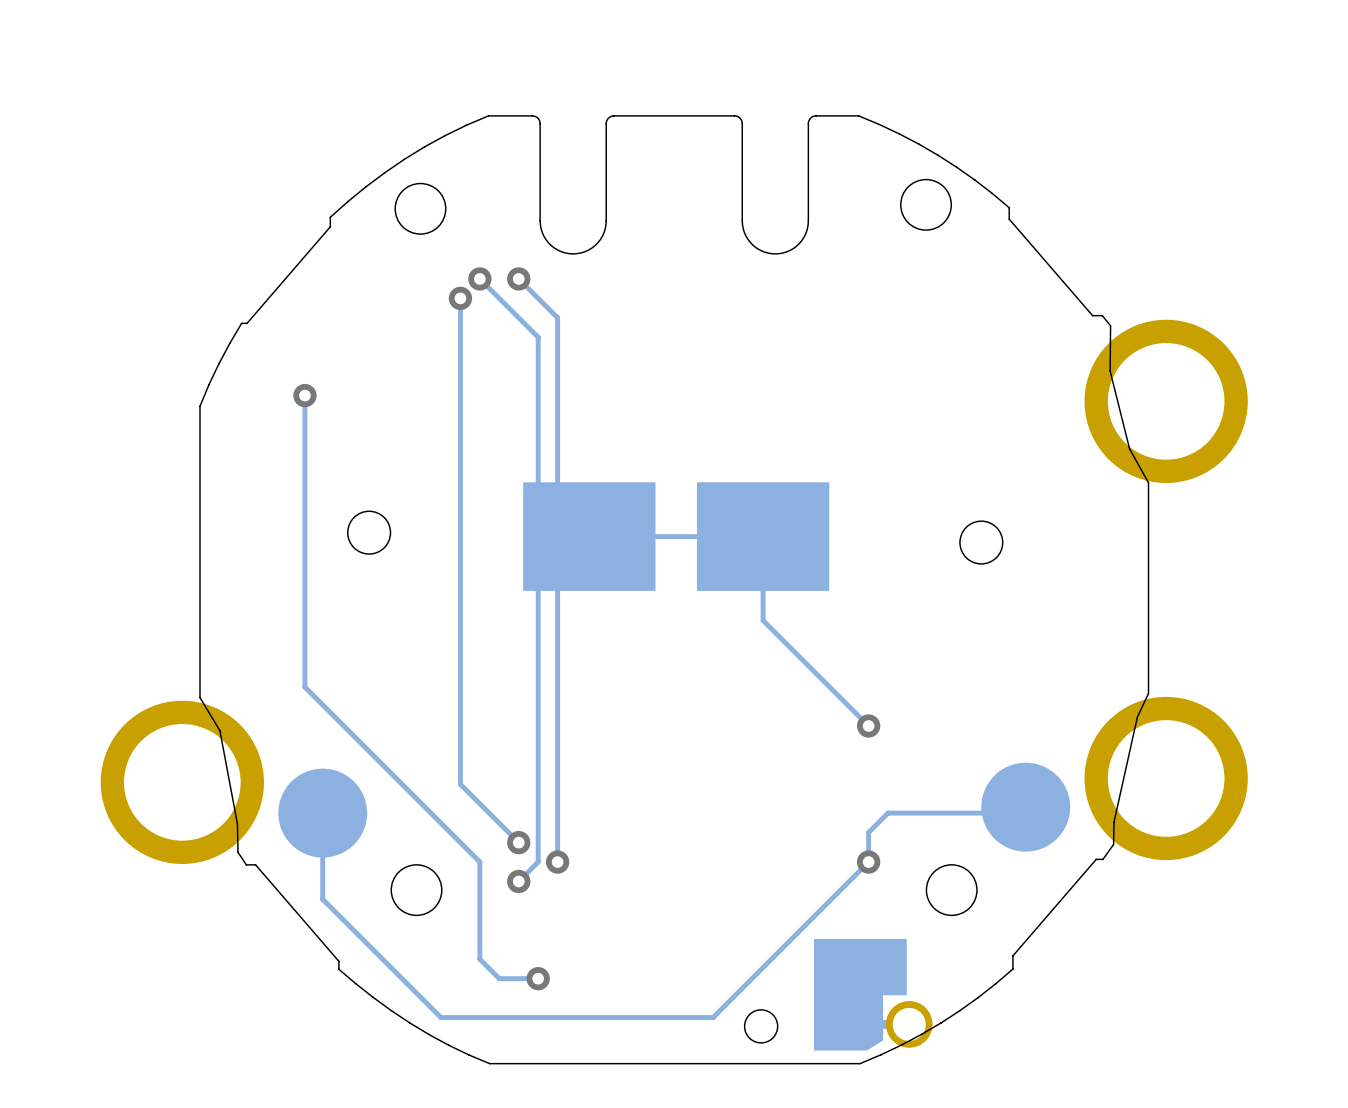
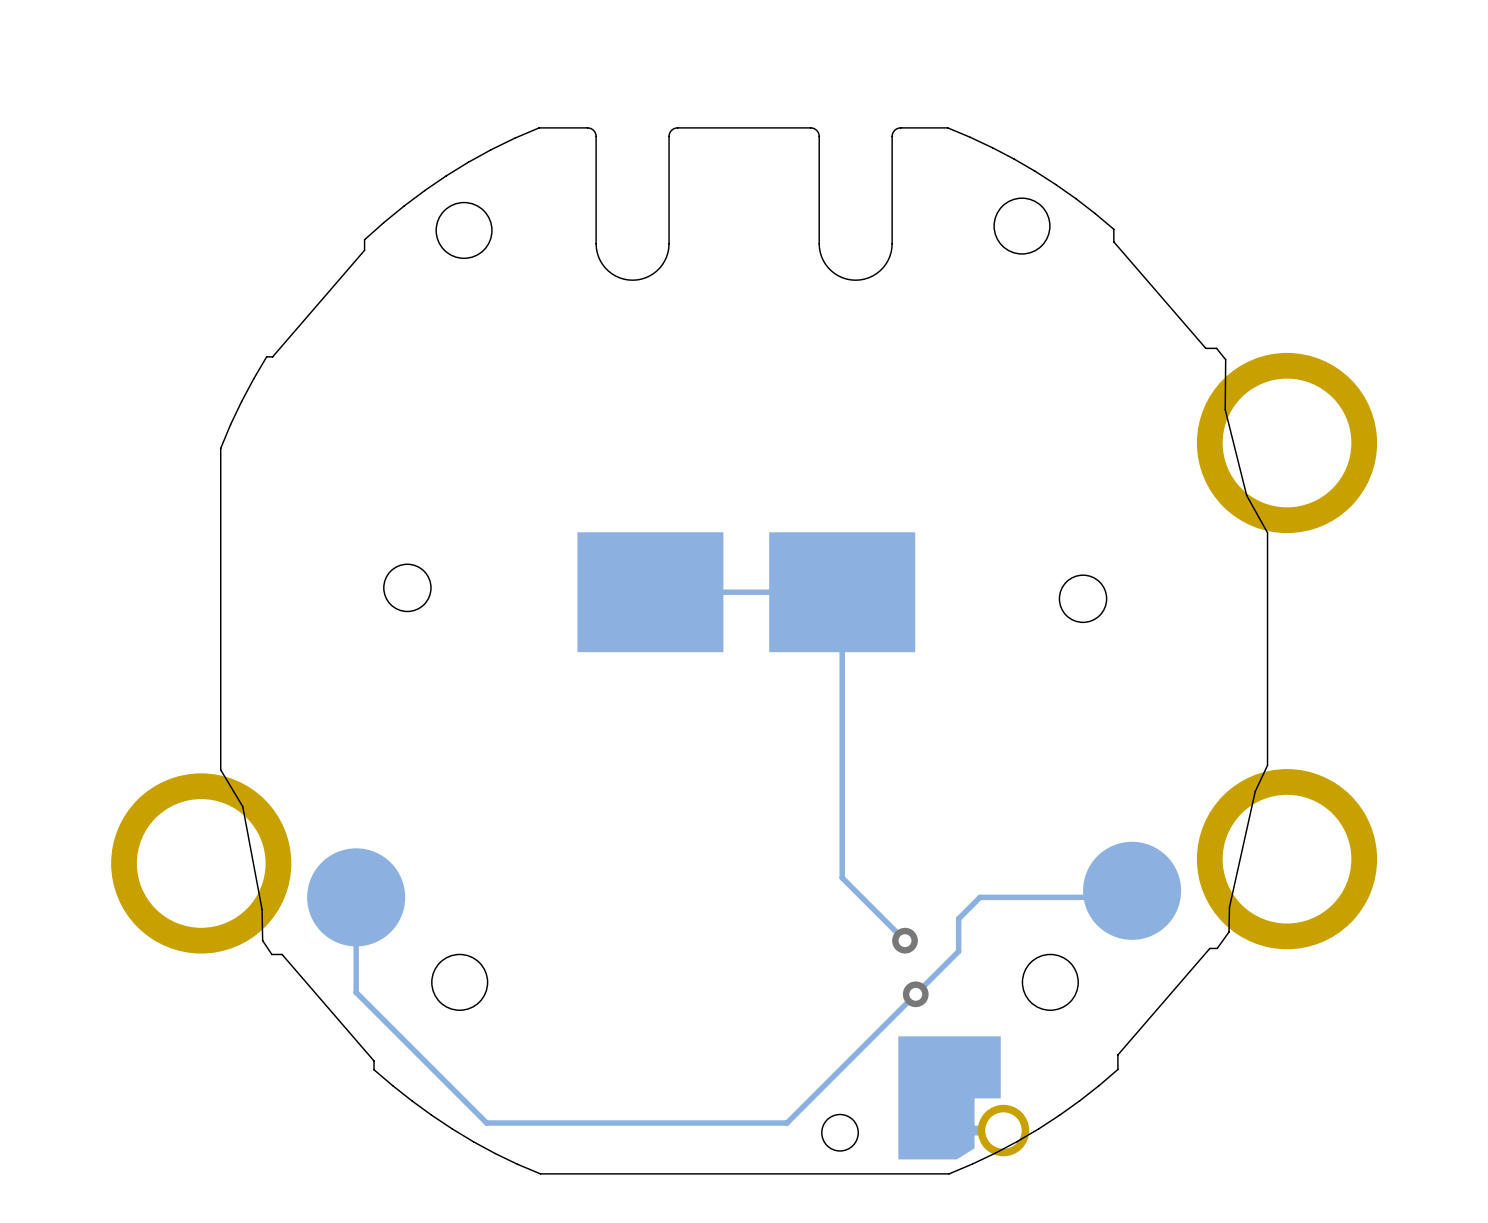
track: (479, 278) (538, 337) (538, 862) (518, 881) -> none
via: (479, 278) -> none
track: (518, 278) (557, 317) (557, 862) -> none
via: (518, 278) -> none
track: (460, 298) (460, 784) (518, 842) -> none
via: (460, 298) -> none
track: (304, 395) (304, 687) (479, 862) (479, 959) (499, 978) (538, 978) -> none
via: (304, 395) -> none
track: (763, 620) (868, 726) -> (842, 684) (842, 877) (905, 940)
via: (868, 726) -> none
via: (518, 842) -> none
via: none -> (905, 940)
via: (557, 862) -> none
via: (868, 862) -> none
via: (518, 881) -> none
via: none -> (915, 994)
via: (538, 978) -> none

